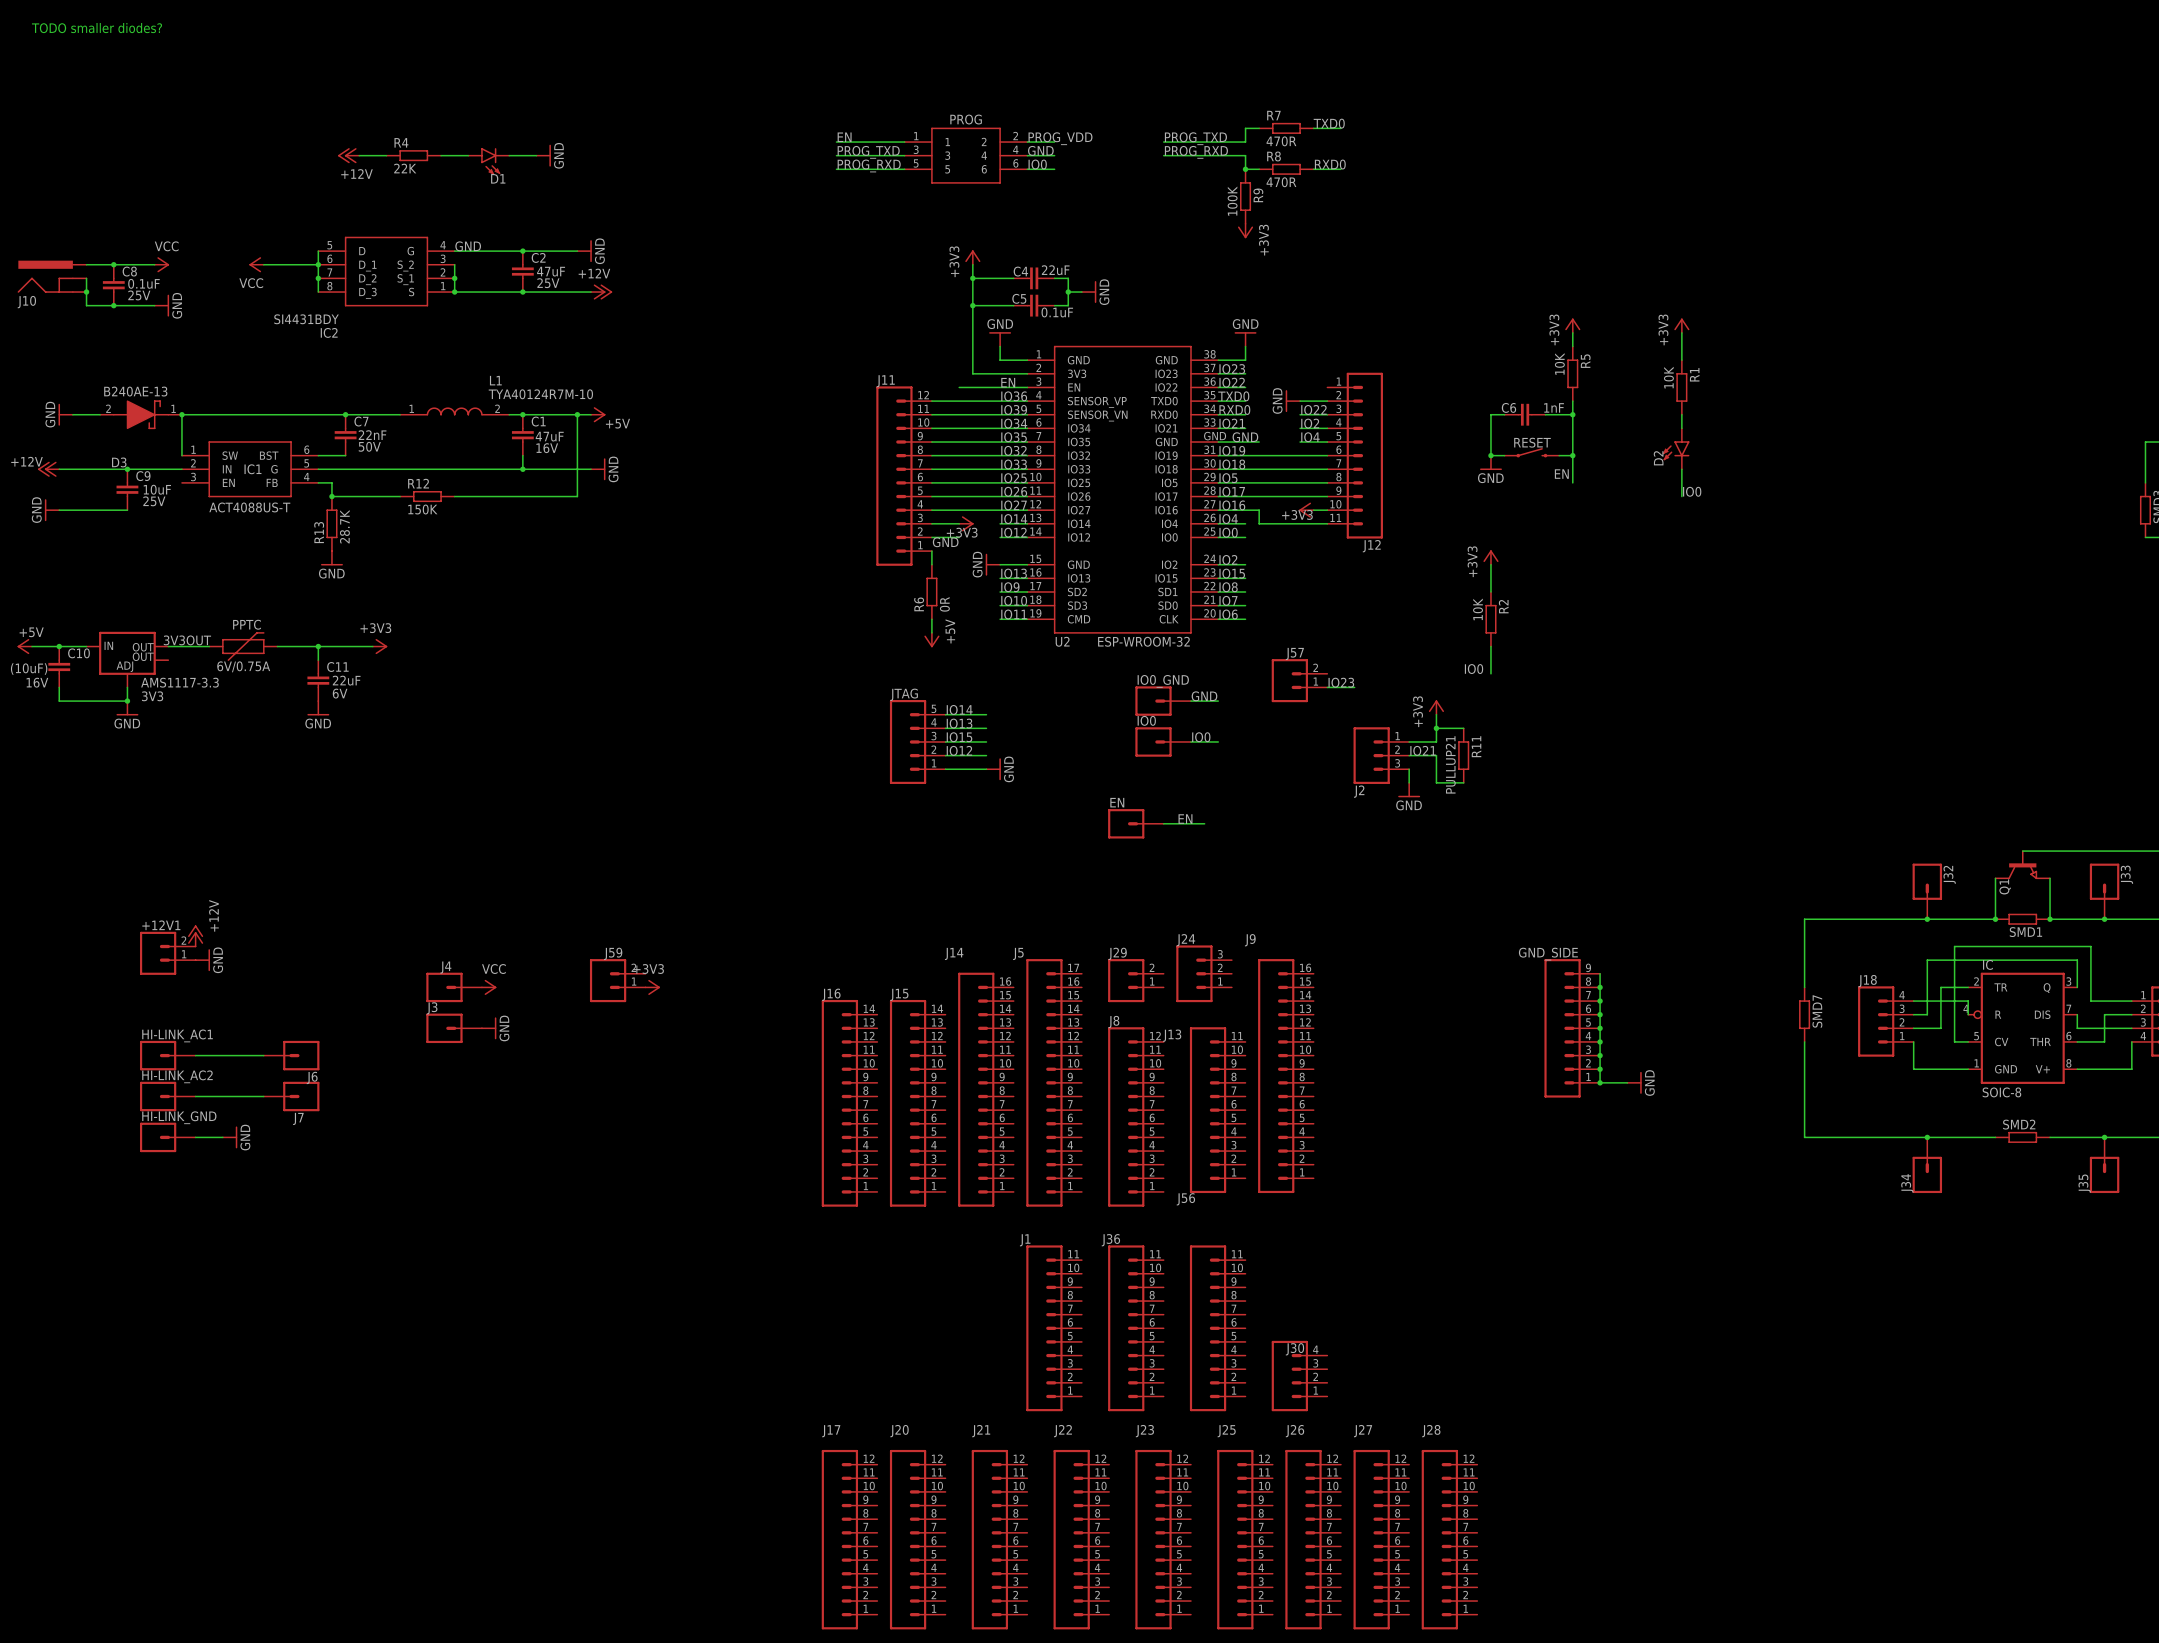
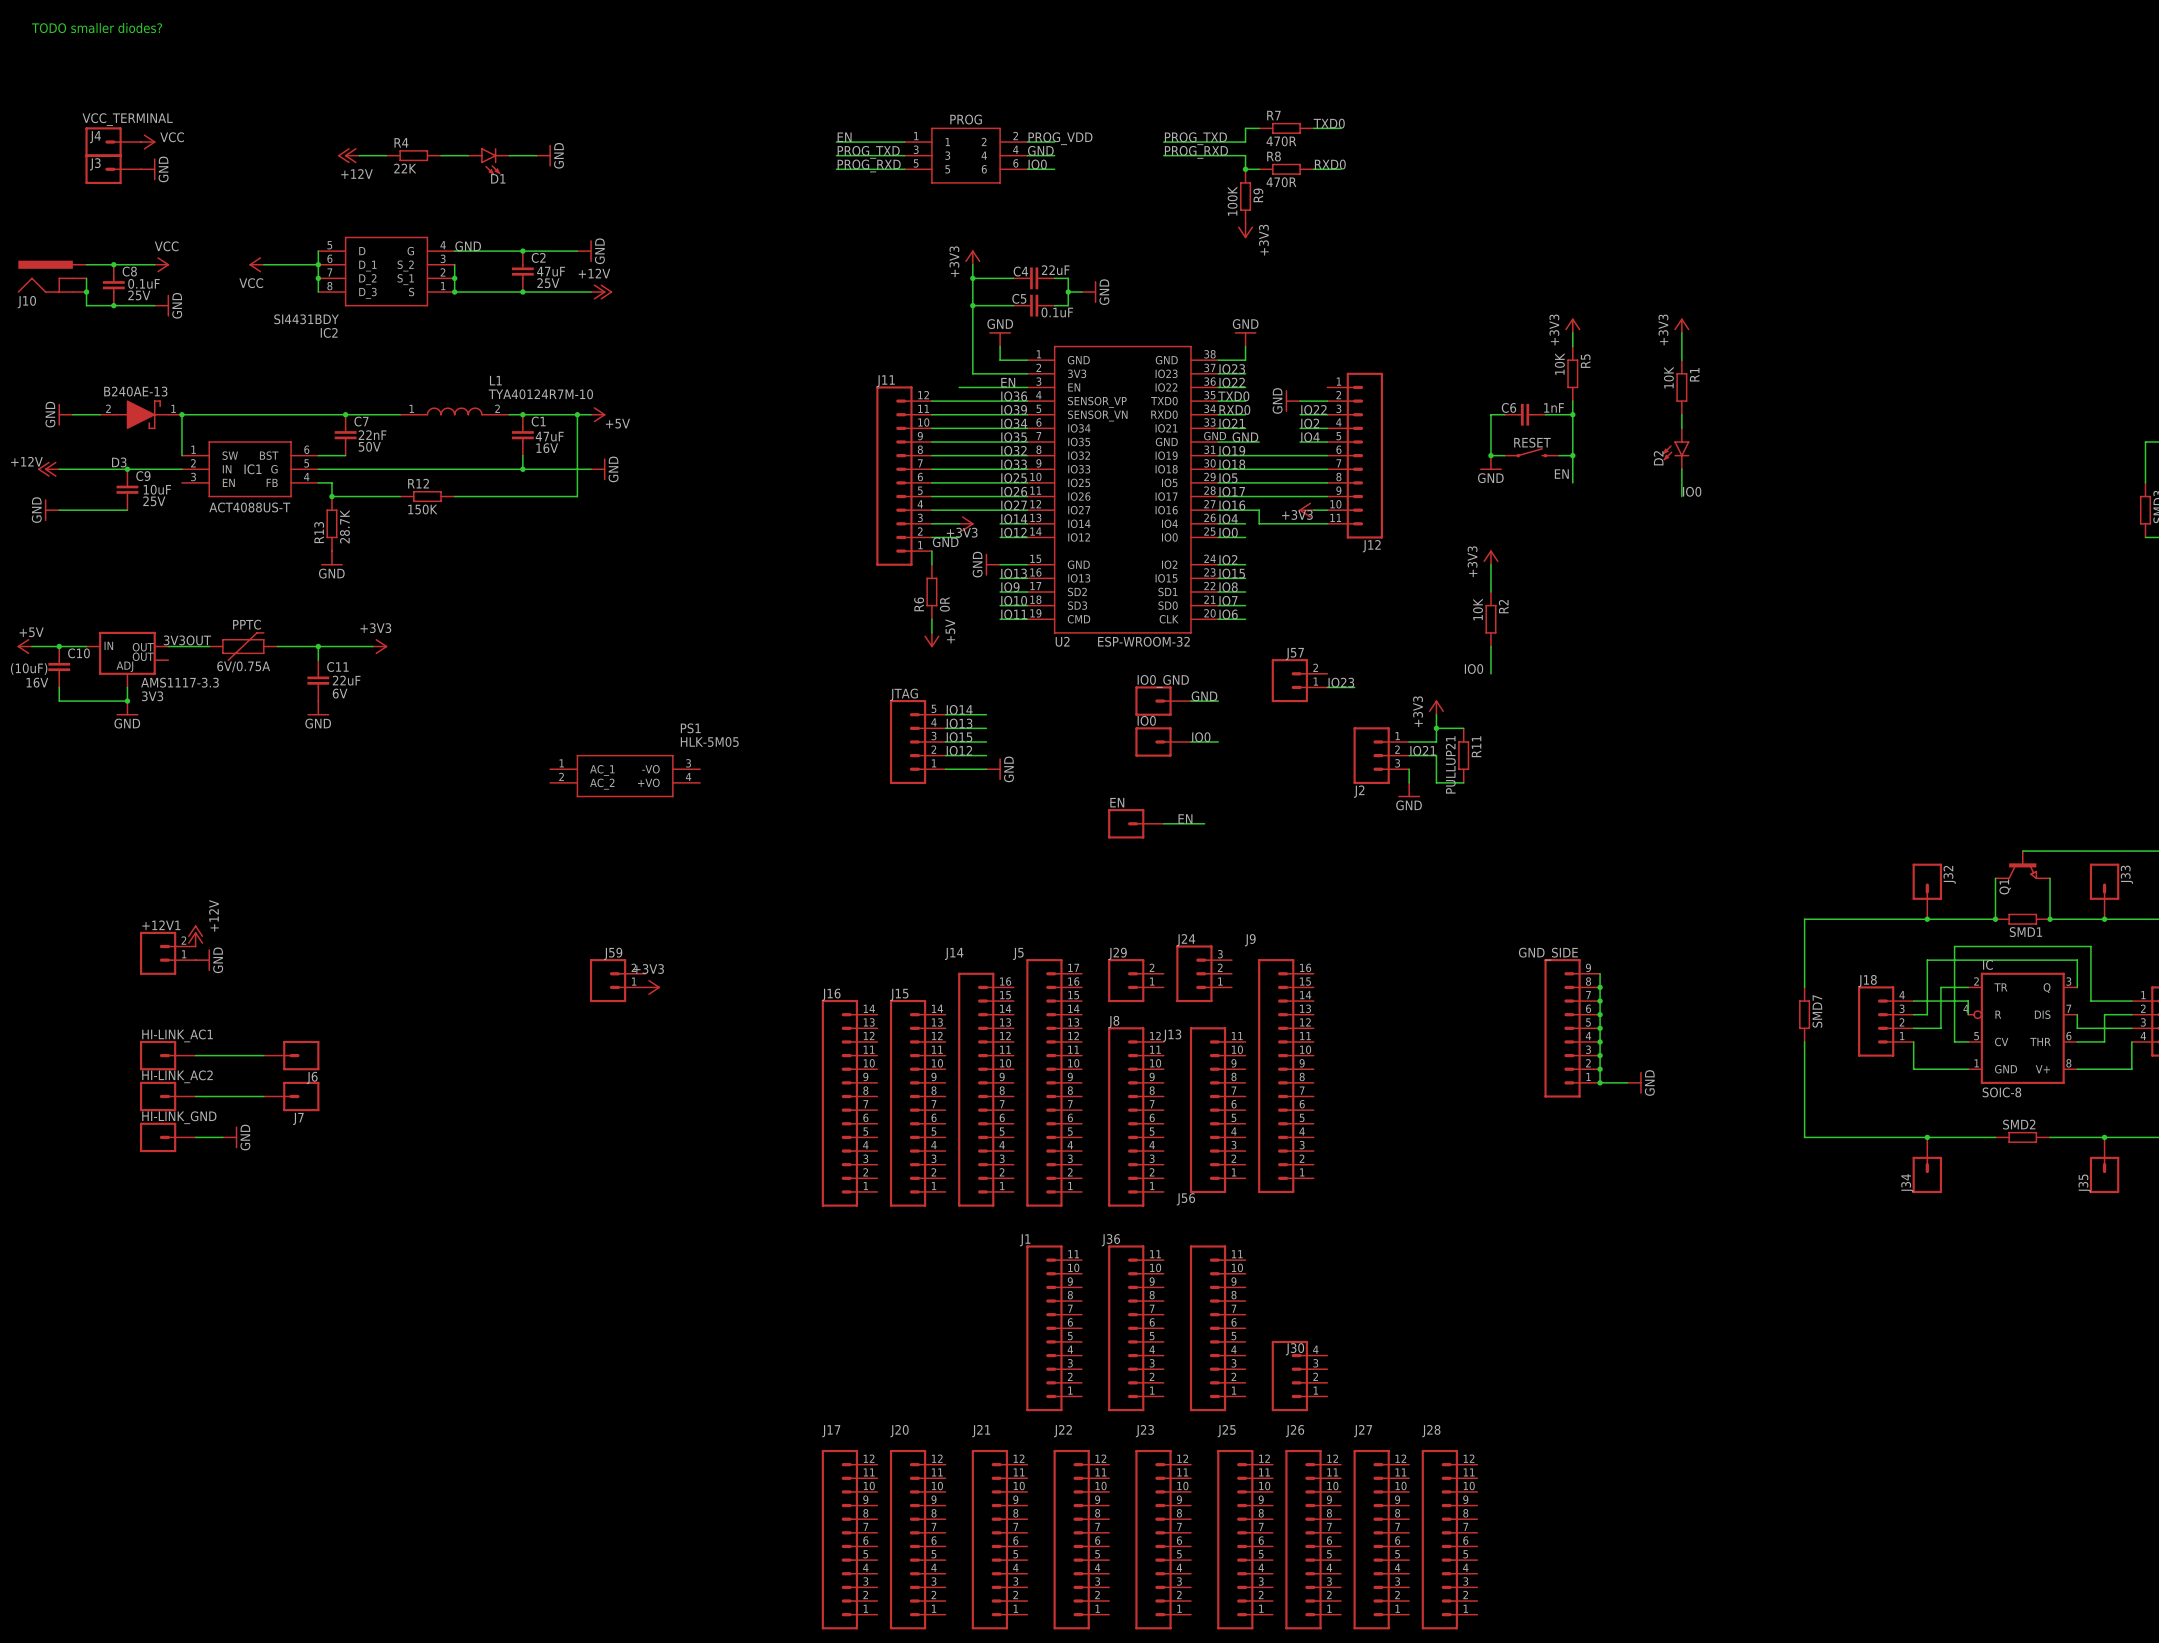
J4 value: none -> VCC_TERMINAL (127, 119)
power symbol: none -> VCC (148, 142)
power symbol: none -> GND (148, 169)
PS1: none -> HLK-5M05 (625, 776)
J4 name position: J4 (445, 967) -> J4 (95, 137)
J4 position: (454, 987) -> (113, 142)
power symbol: VCC (489, 987) -> none
J3 name position: J3 (432, 1008) -> J3 (95, 164)
J3 position: (454, 1028) -> (113, 169)
power symbol: GND (489, 1028) -> none

